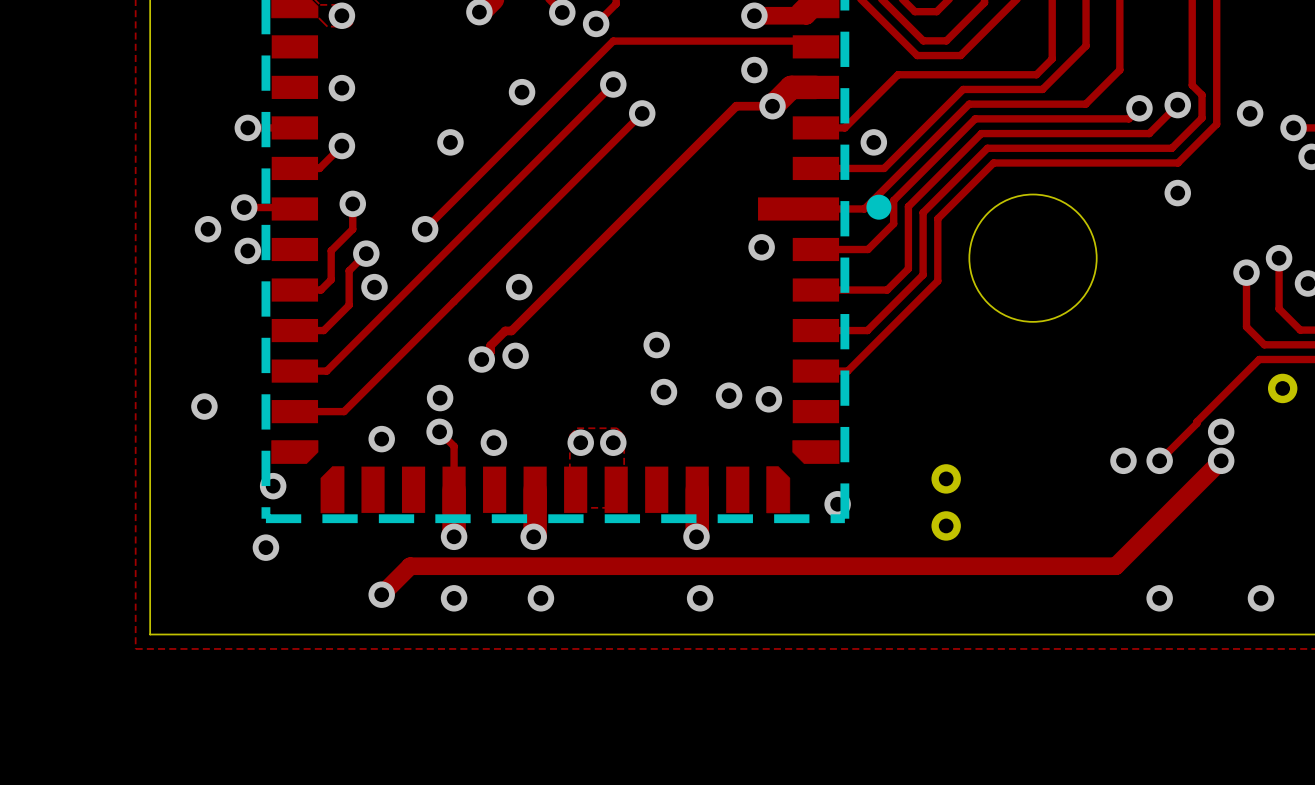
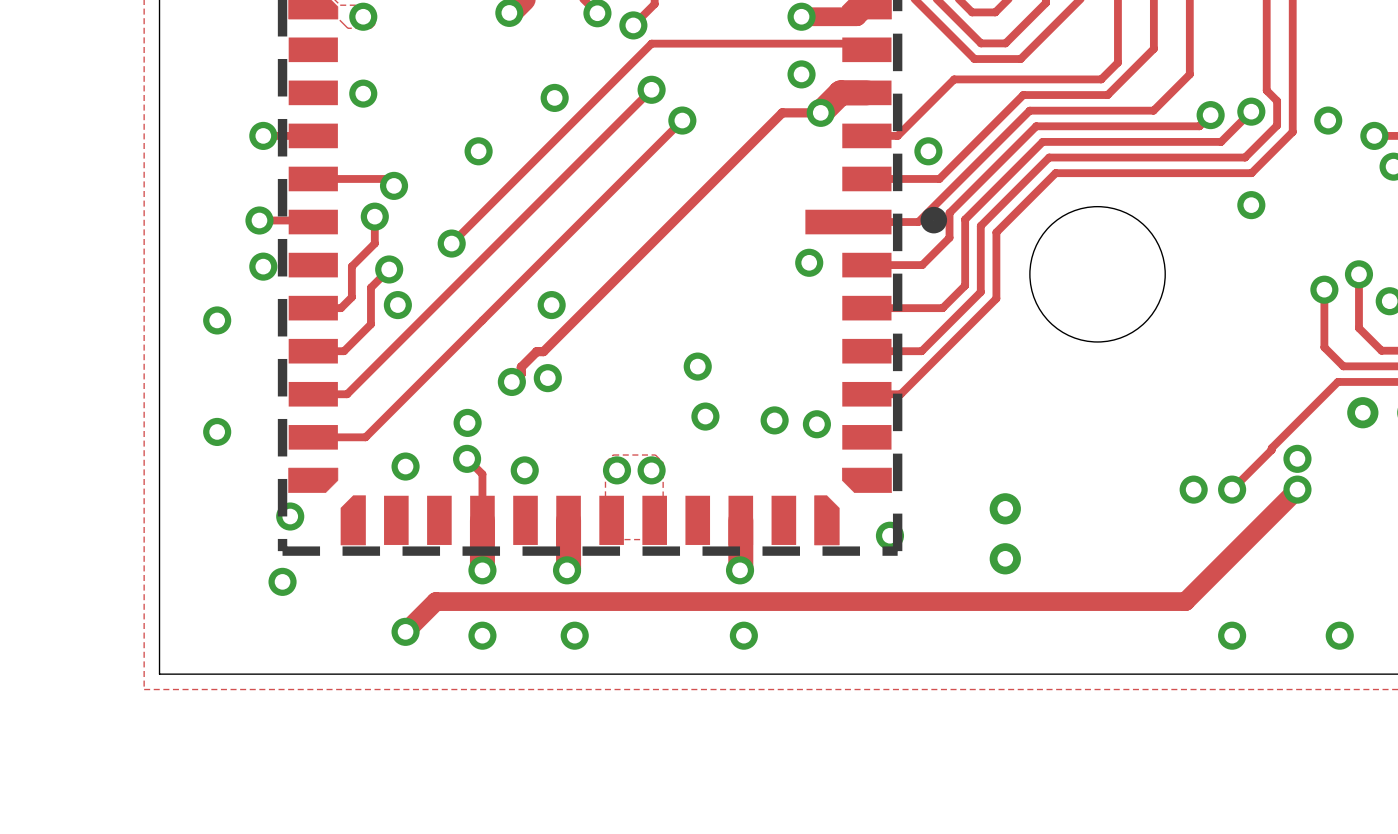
track: (341, 146) (319, 168) -> (394, 185) (387, 178) (339, 178)
via position: (341, 146) -> (394, 185)
via position: (208, 229) -> (217, 320)

